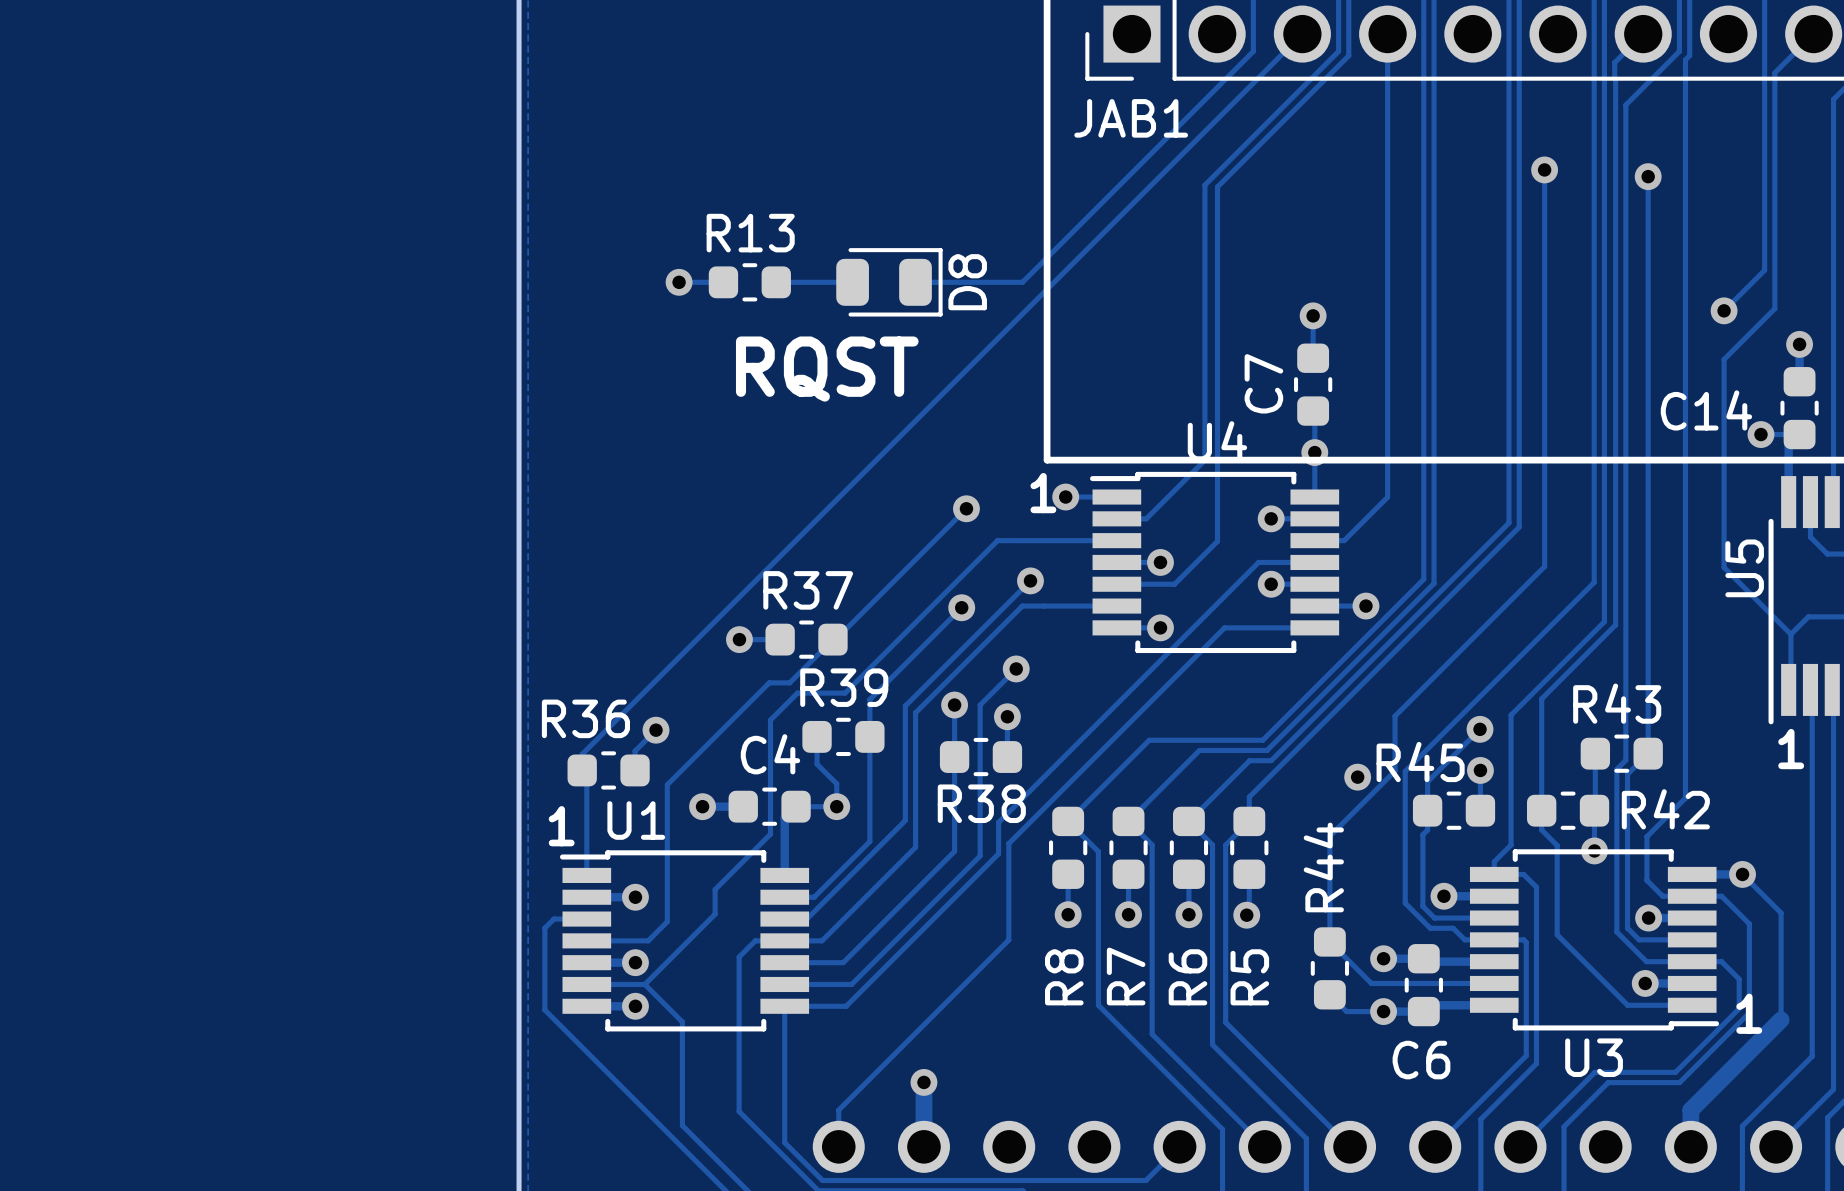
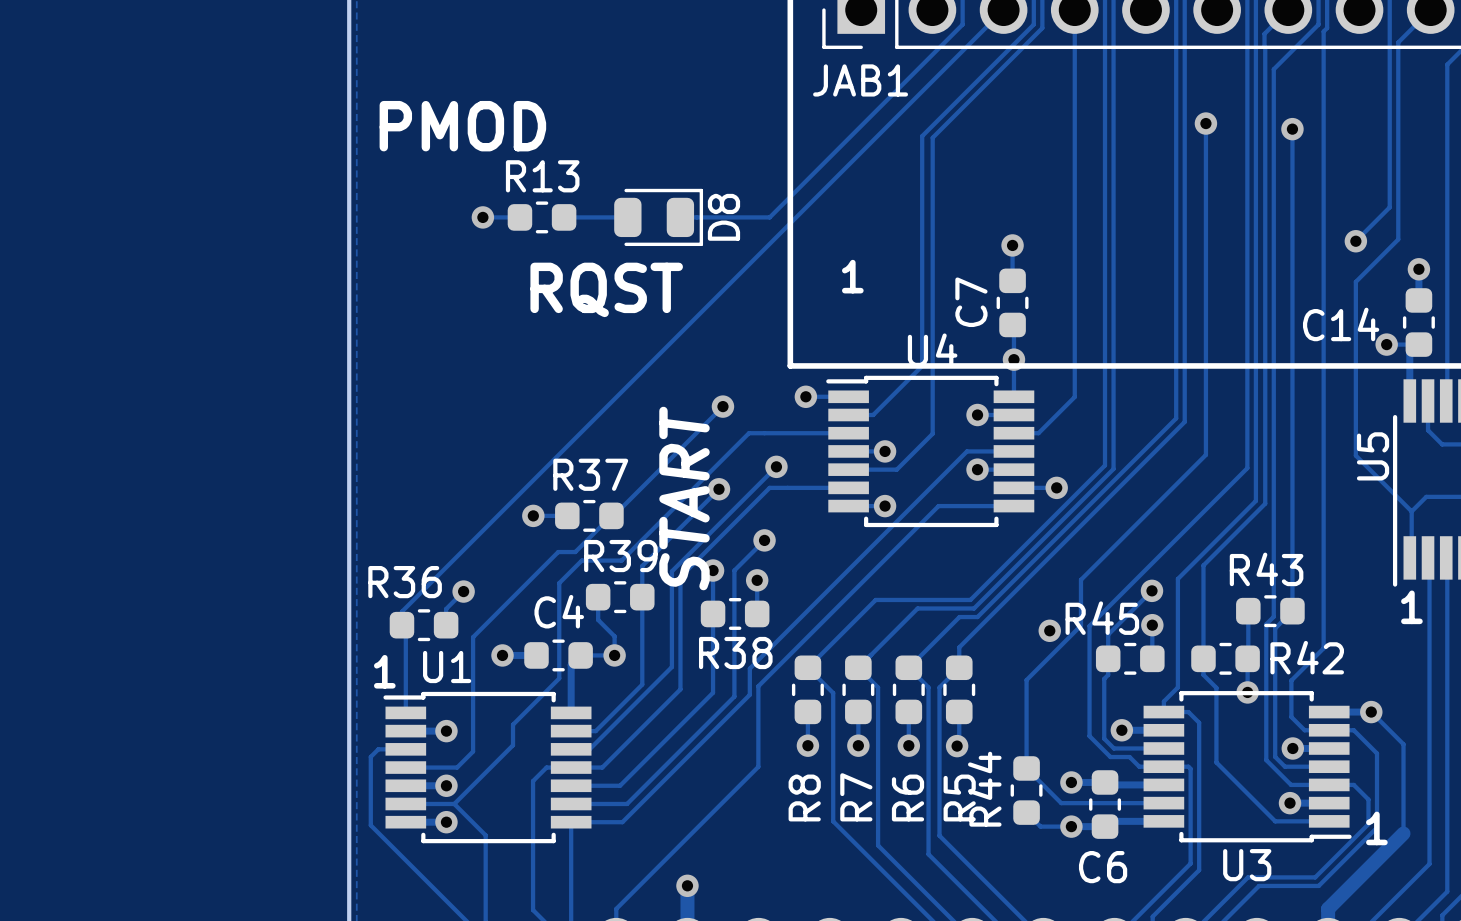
text: none -> PMOD (462, 126)
text position: 1 (1043, 493) -> 1 (852, 276)
text: none -> START (684, 498)
R44 name position: R44 (1323, 867) -> R44 (984, 789)

